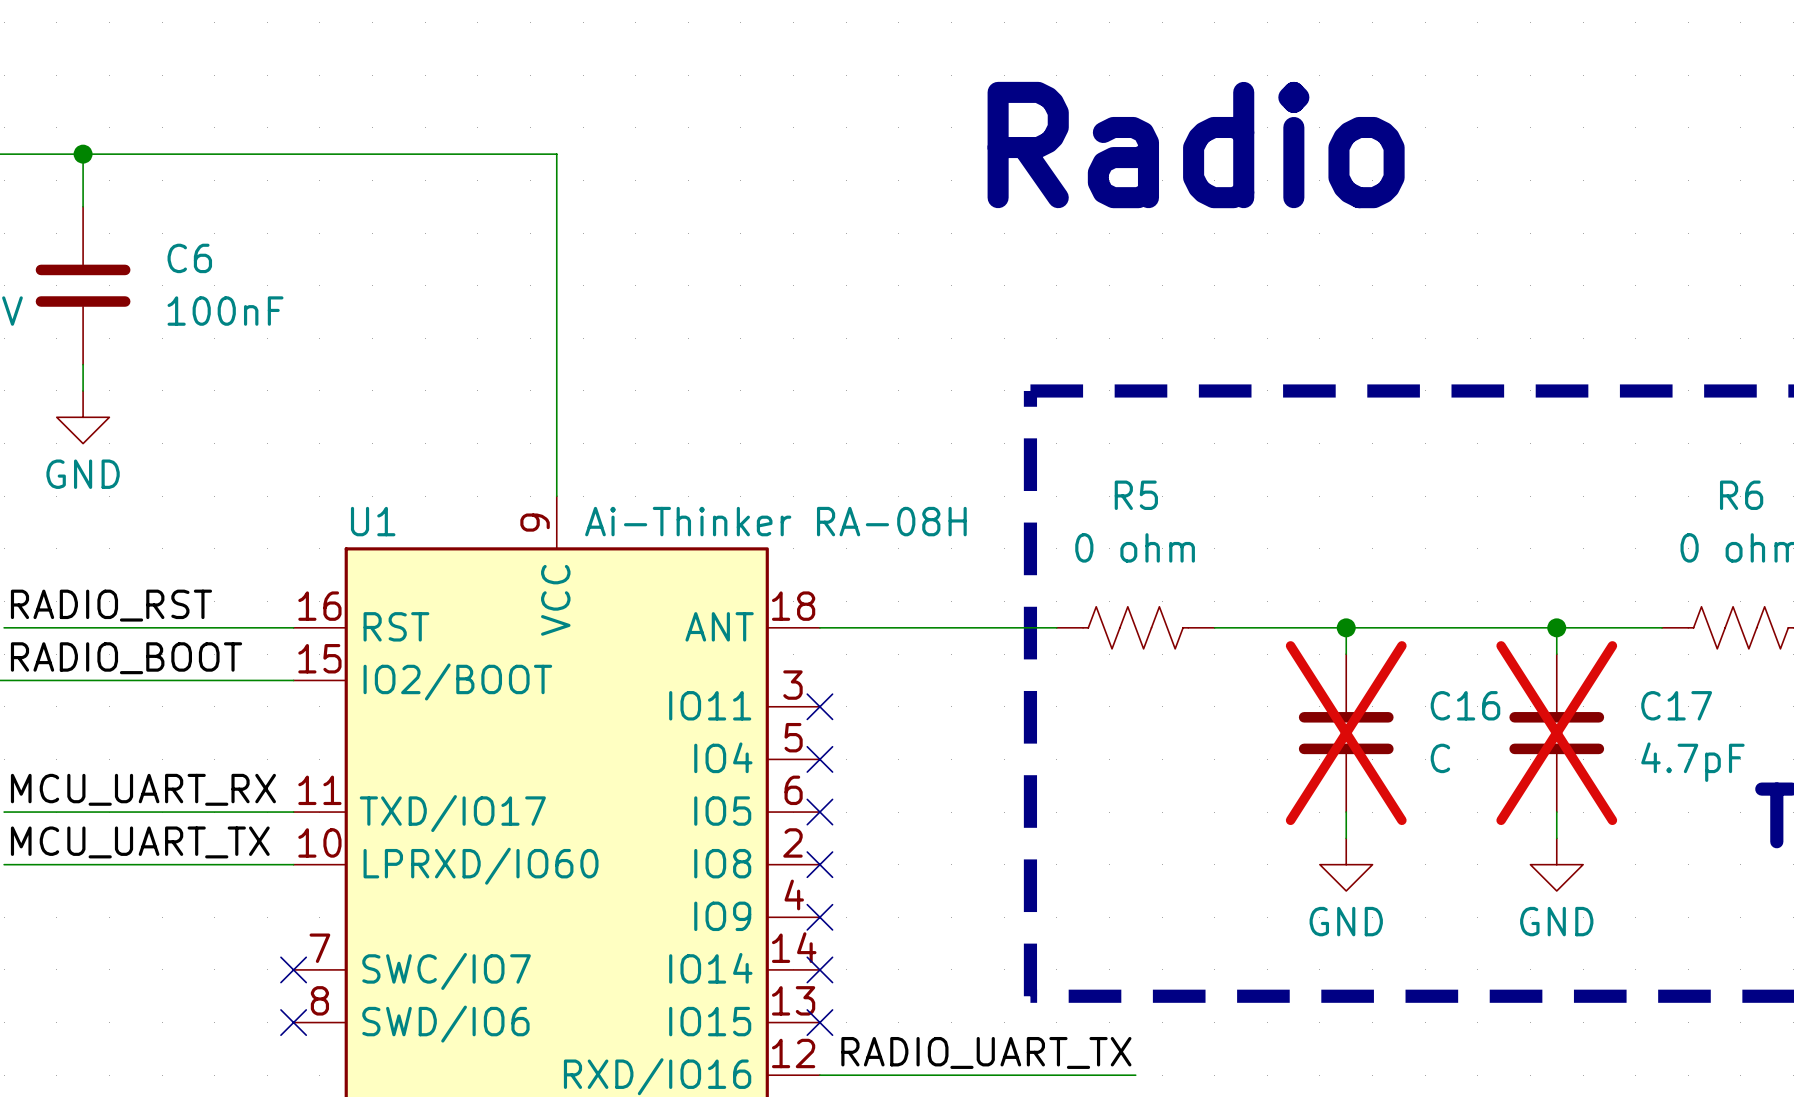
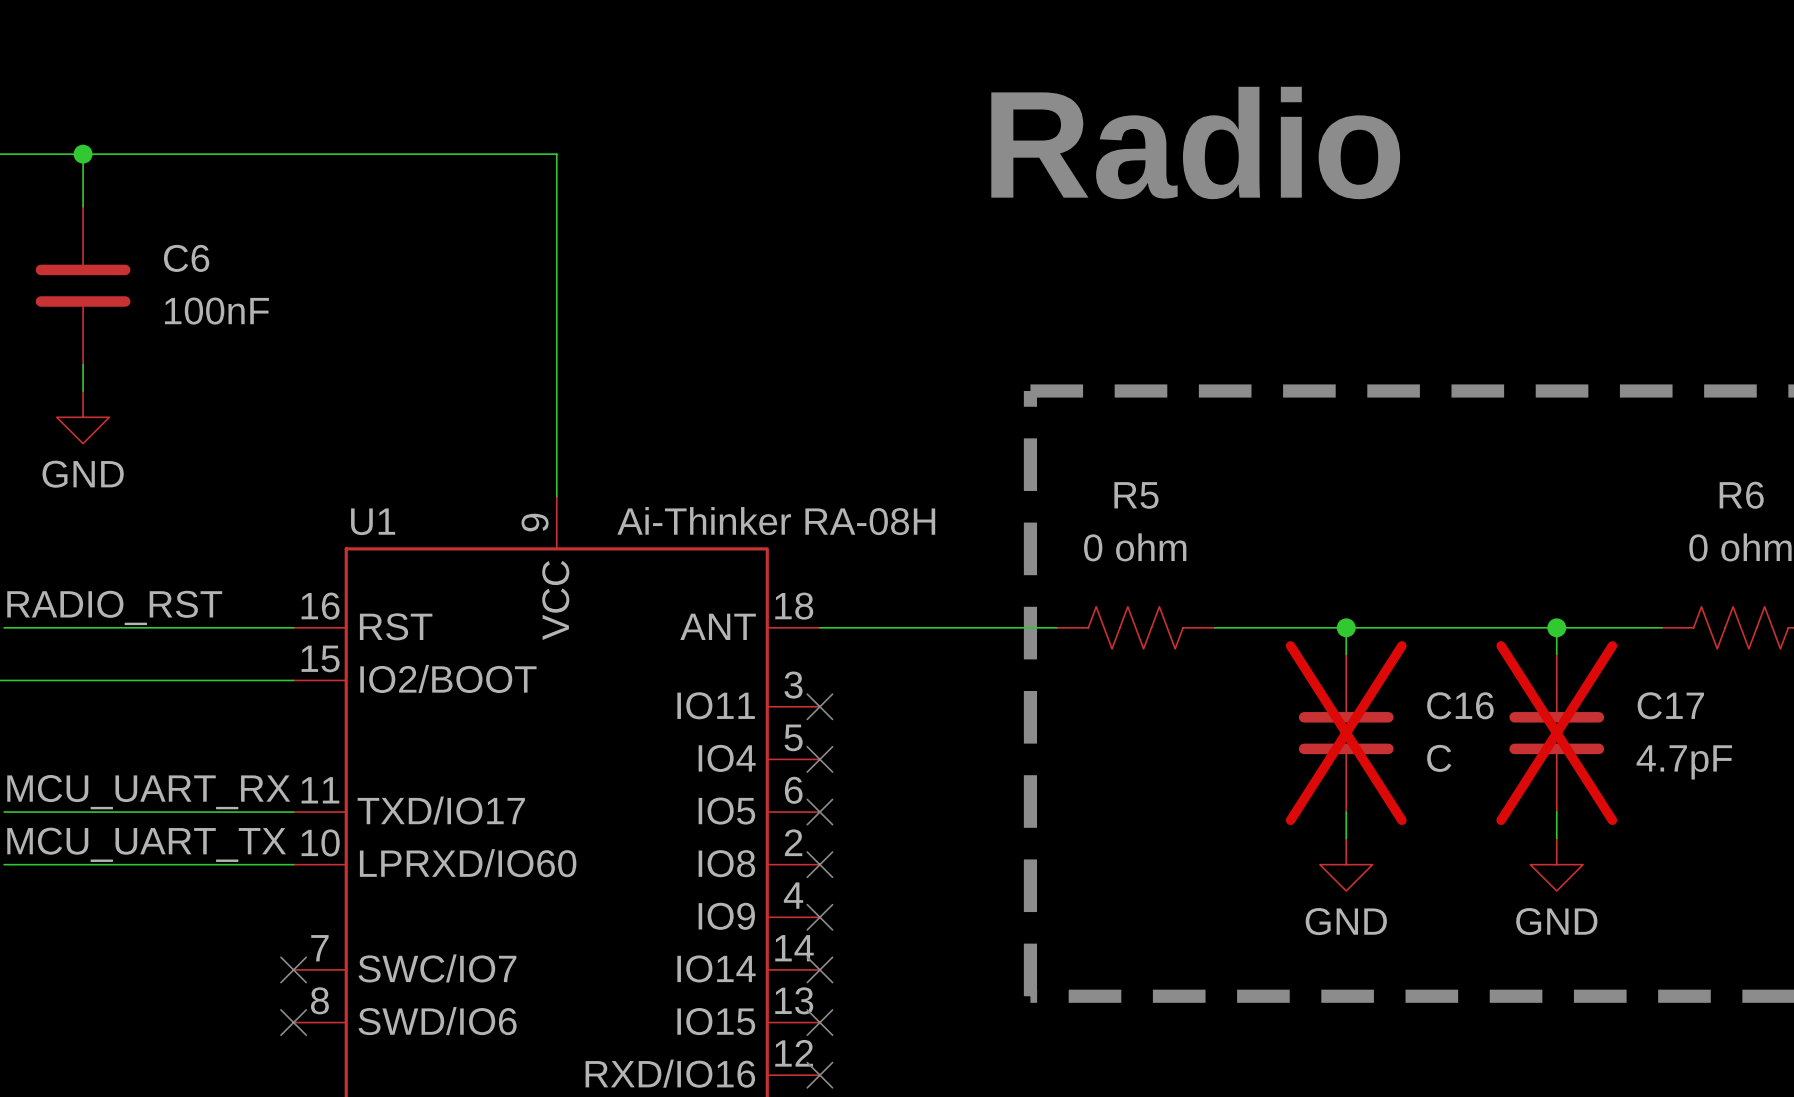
label: RADIO_BOOT (126, 658) -> none
label: RADIO_UART_TX (986, 1052) -> none
wire: (819, 1075) (1135, 1075) -> none
no-connect mark: none -> (819, 1075)

